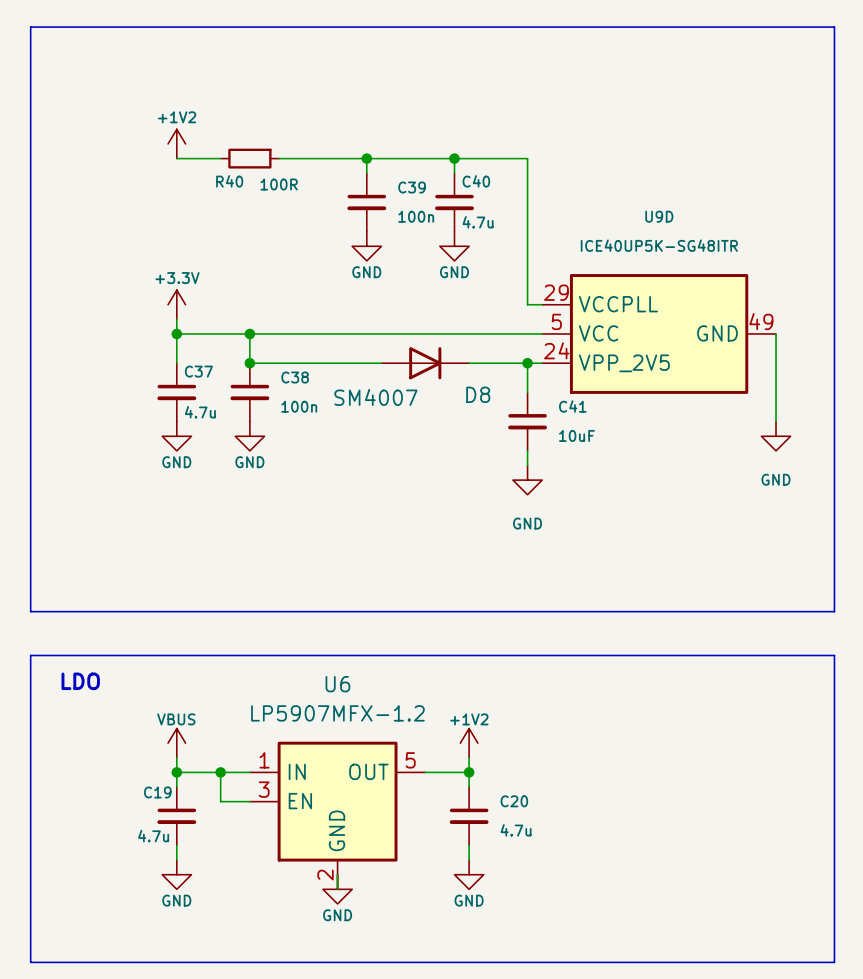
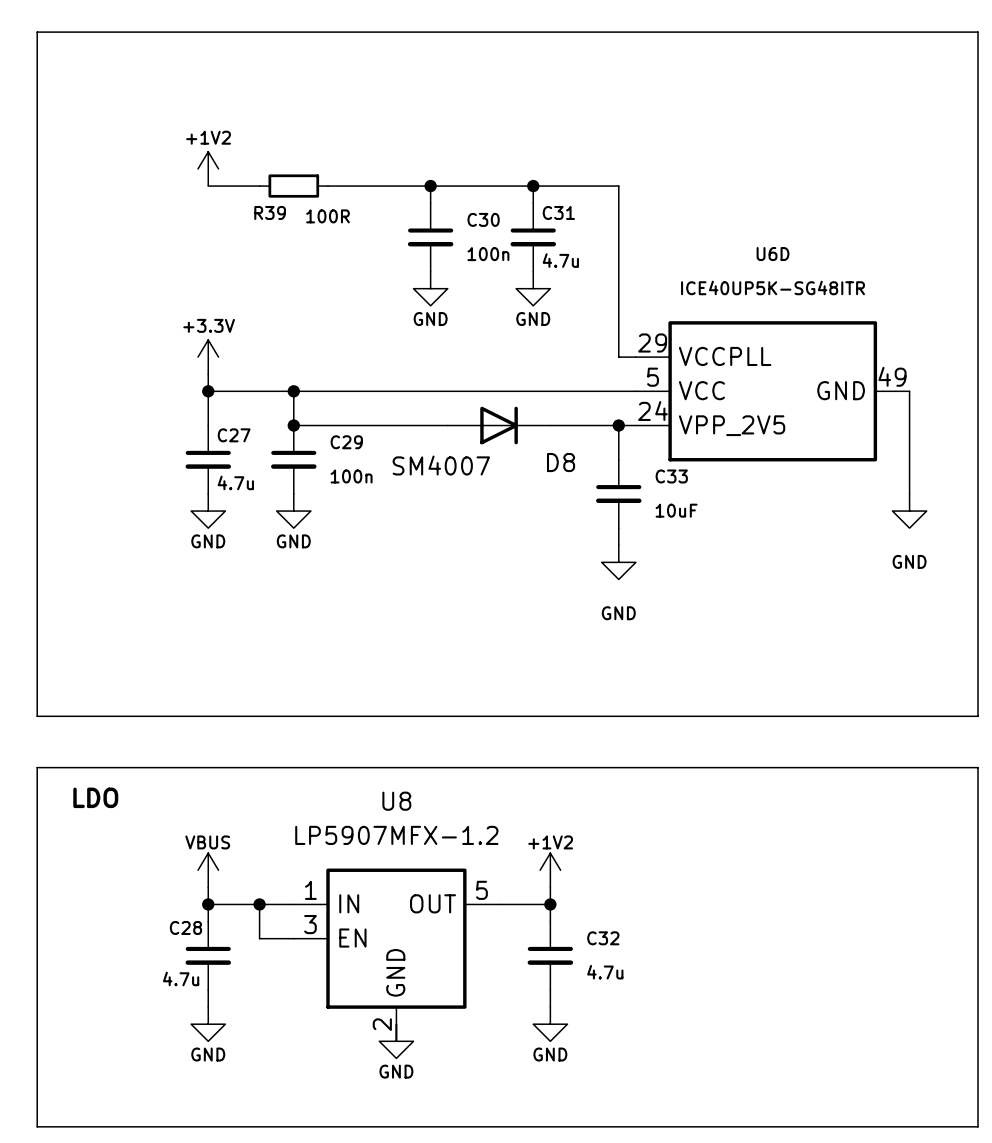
R40 name: R40 (229, 181) -> R39 (270, 212)
C40 name: C40 (476, 181) -> C31 (558, 212)
C39 name: C39 (412, 187) -> C30 (483, 219)
U9D name: U9D (659, 216) -> U6D (773, 254)
C37 name: C37 (198, 371) -> C27 (234, 435)
C38 name: C38 (295, 377) -> C29 (346, 442)
C41 name: C41 (572, 406) -> C33 (671, 476)
U6 name: U6 (337, 684) -> U8 (396, 801)
C19 name: C19 (157, 792) -> C28 (185, 927)
C20 name: C20 (514, 801) -> C32 (603, 938)

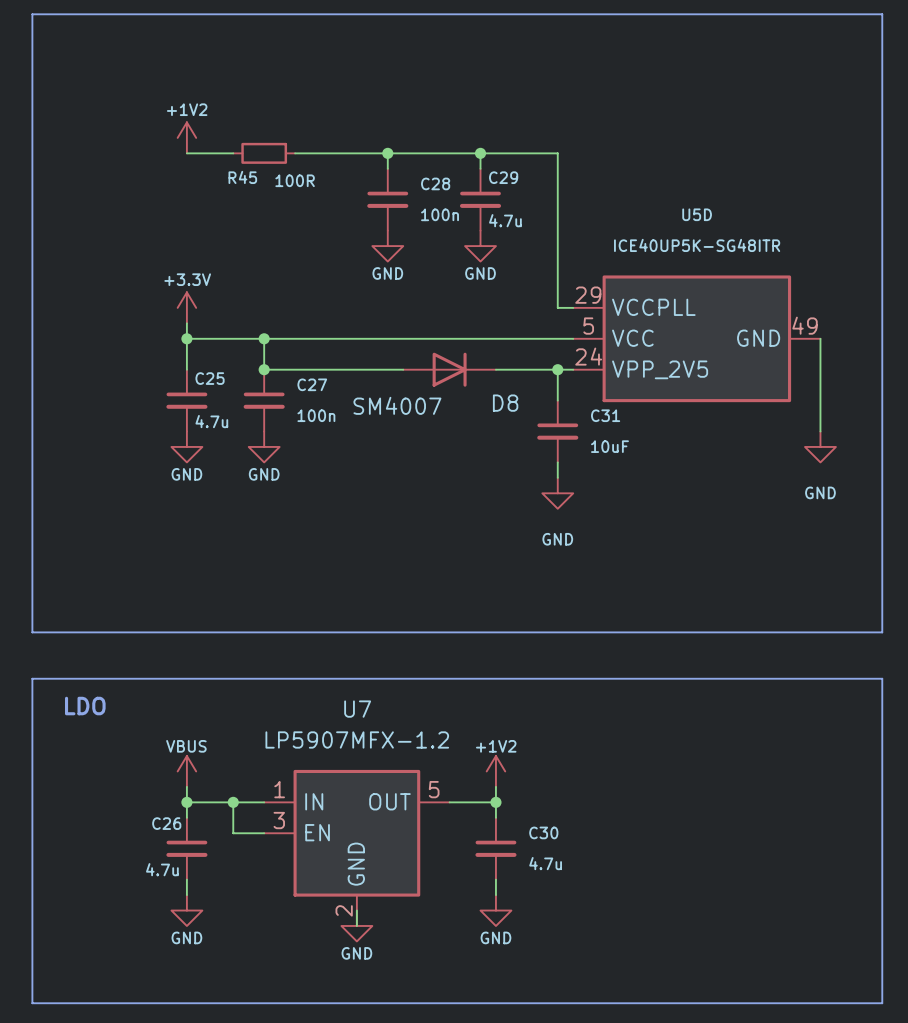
R39 name: R39 (270, 212) -> R45 (242, 177)
C31 name: C31 (558, 212) -> C29 (503, 177)
C30 name: C30 (483, 219) -> C28 (435, 183)
U6D name: U6D (773, 254) -> U5D (697, 214)
C27 name: C27 (234, 435) -> C25 (210, 378)
C29 name: C29 (346, 442) -> C27 (312, 384)
C33 name: C33 (671, 476) -> C31 (605, 415)
U8 name: U8 (396, 801) -> U7 (357, 709)
C28 name: C28 (185, 927) -> C26 (166, 823)
C32 name: C32 (603, 938) -> C30 (543, 832)

